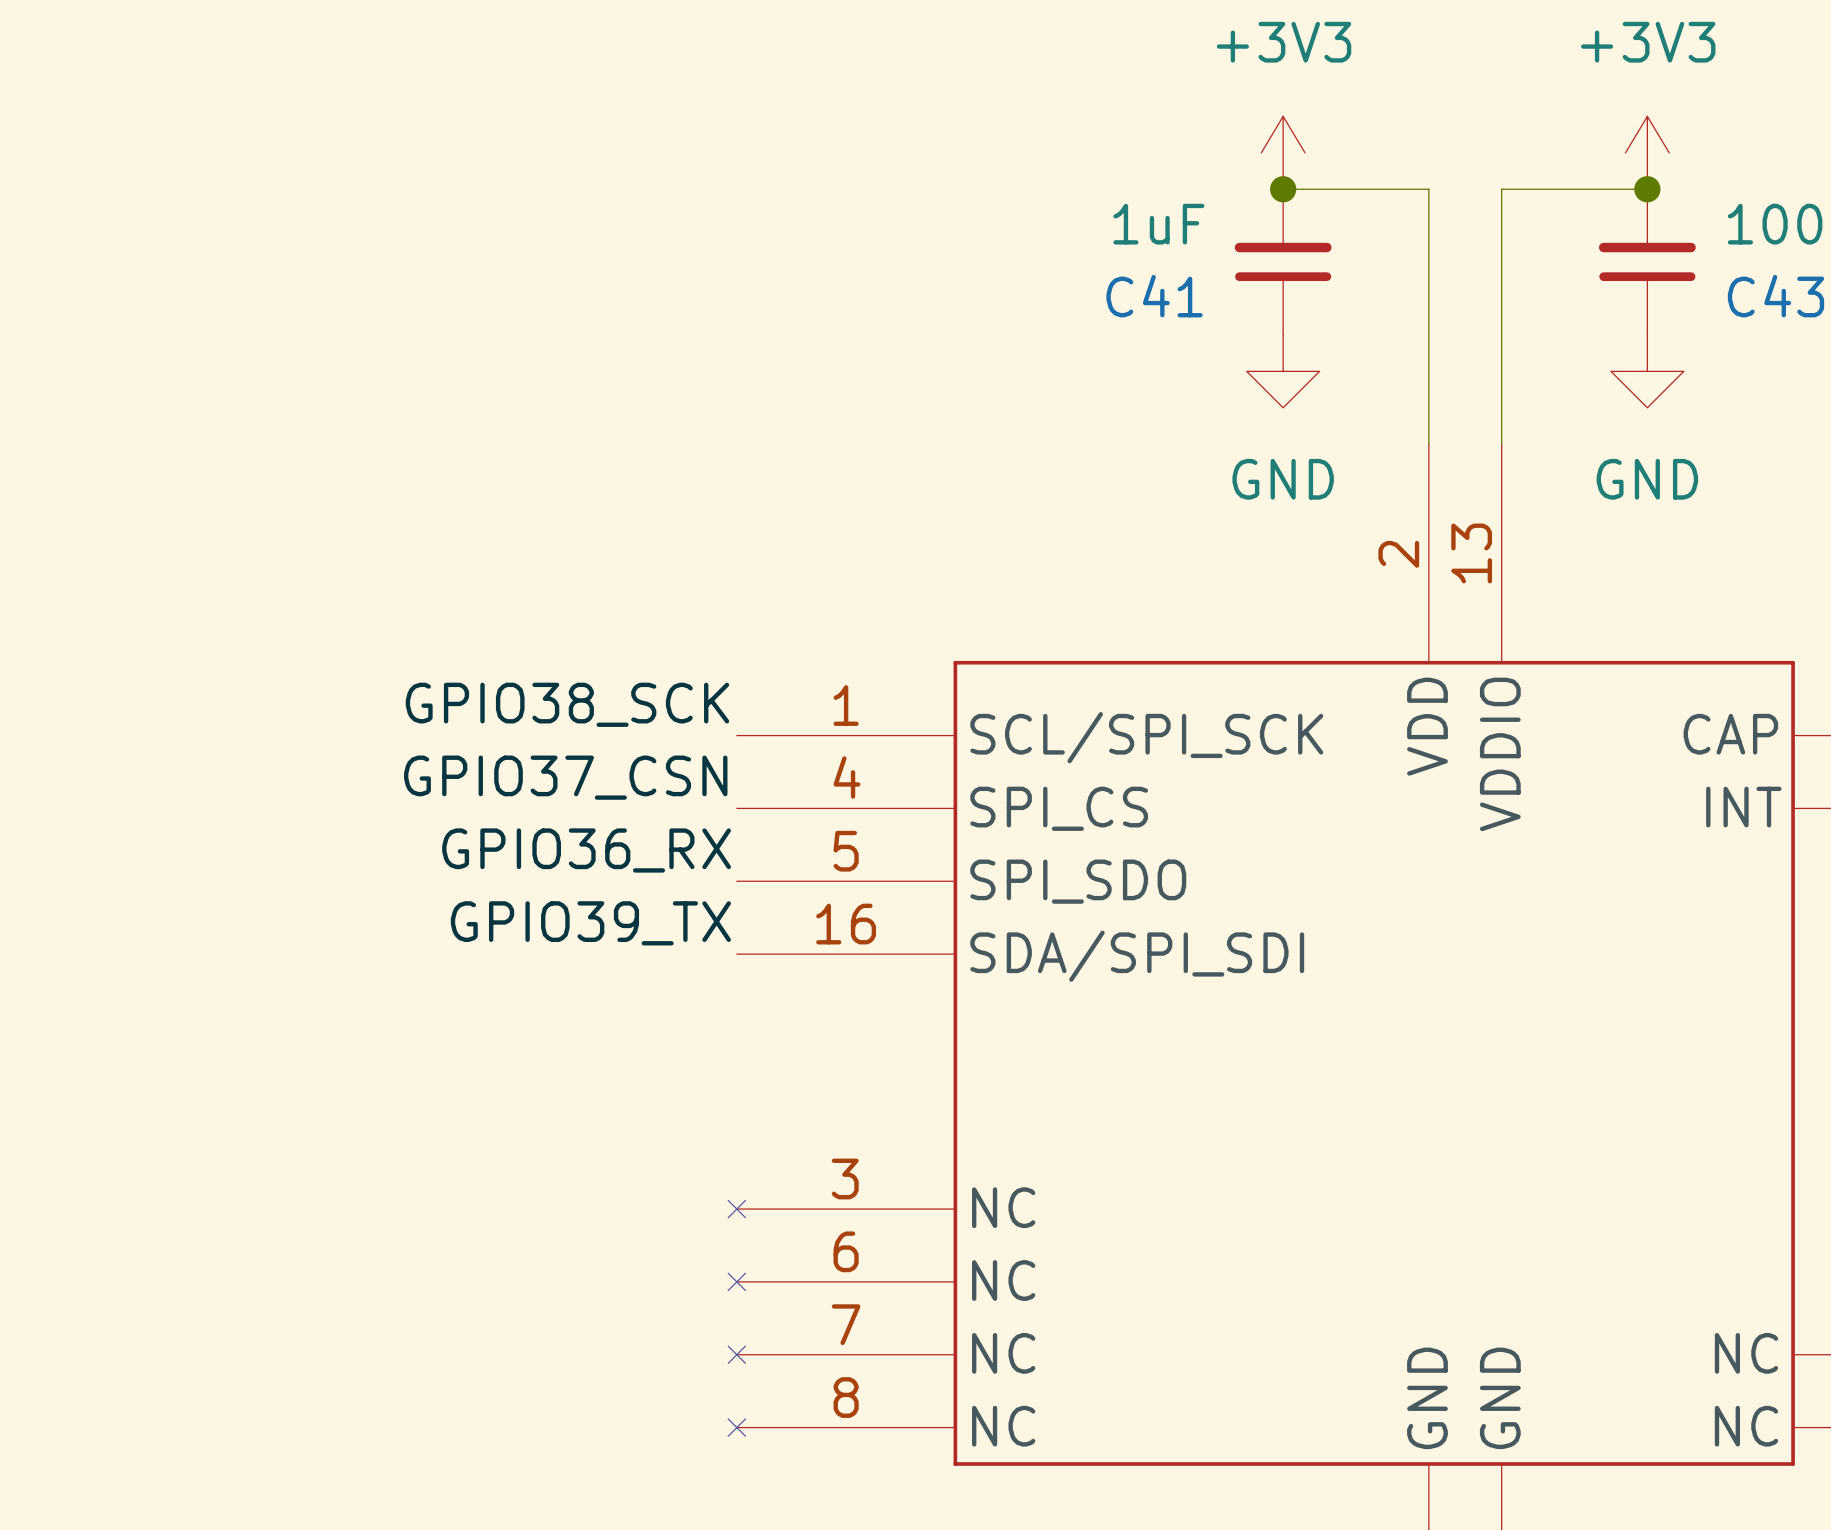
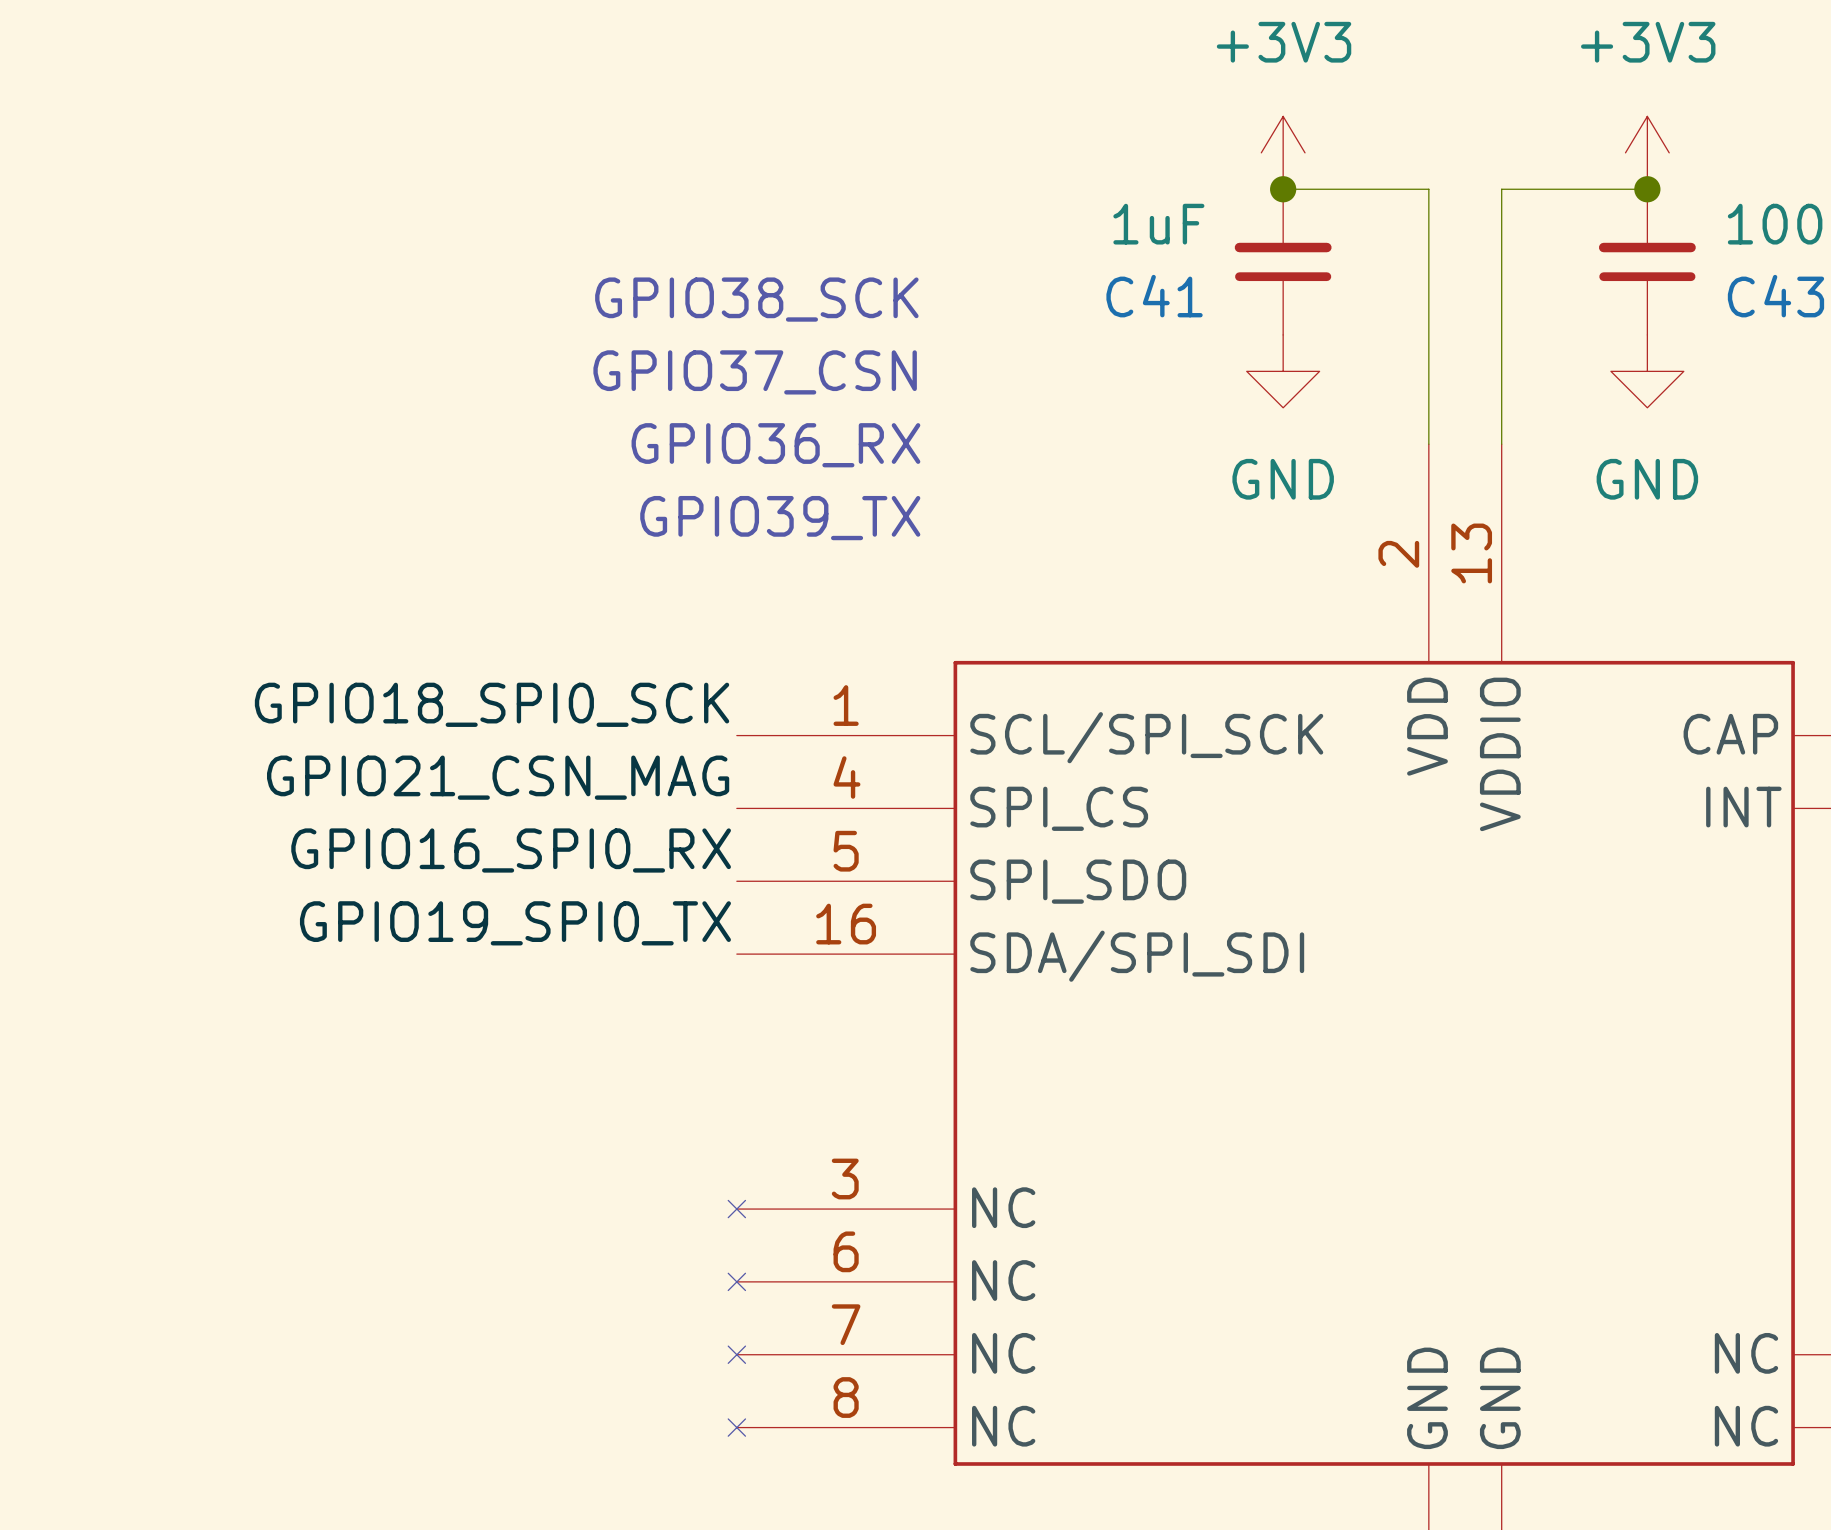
text: none -> GPIO38_SCK (756, 299)
text: none -> GPIO37_CSN (755, 372)
text: none -> GPIO36_RX (775, 445)
text: none -> GPIO39_TX (780, 518)
label: GPIO38_SCK (567, 704) -> GPIO18_SPI0_SCK (492, 704)
label: GPIO37_CSN (565, 777) -> GPIO21_CSN_MAG (498, 777)
label: GPIO36_RX (586, 850) -> GPIO16_SPI0_RX (511, 850)
label: GPIO39_TX (590, 923) -> GPIO19_SPI0_TX (515, 923)

